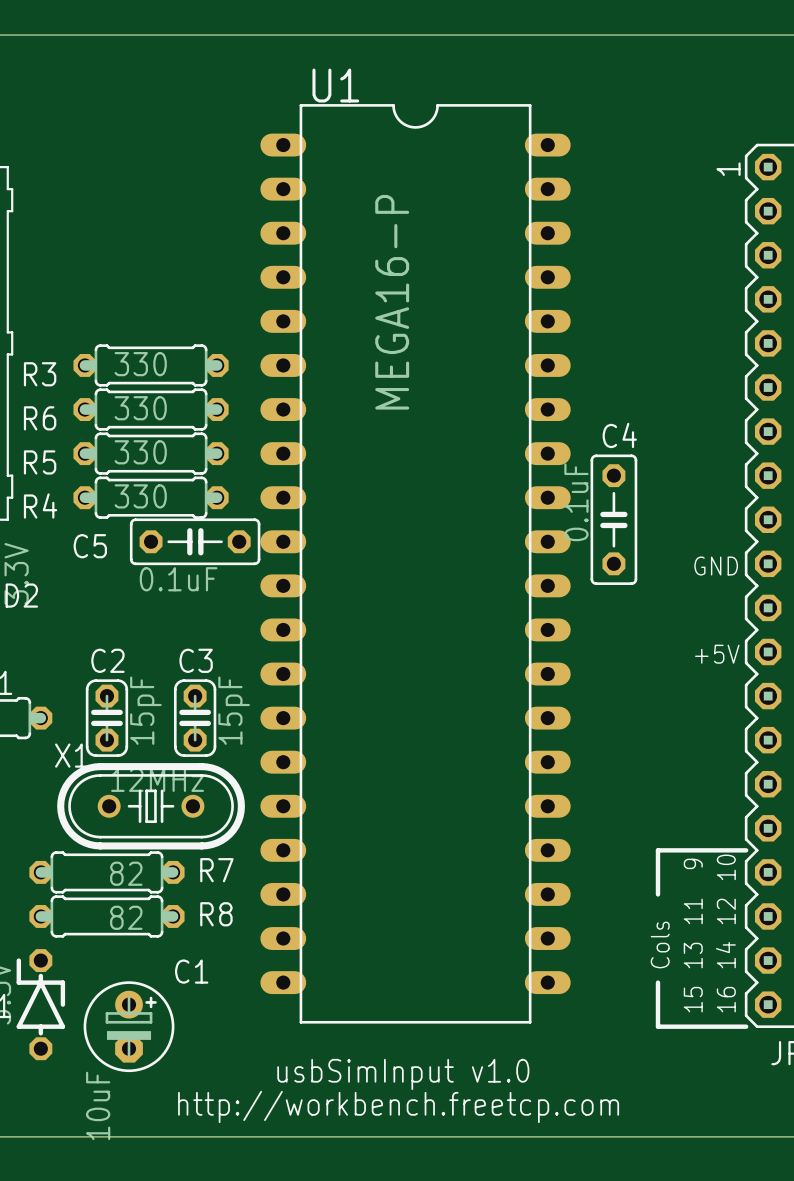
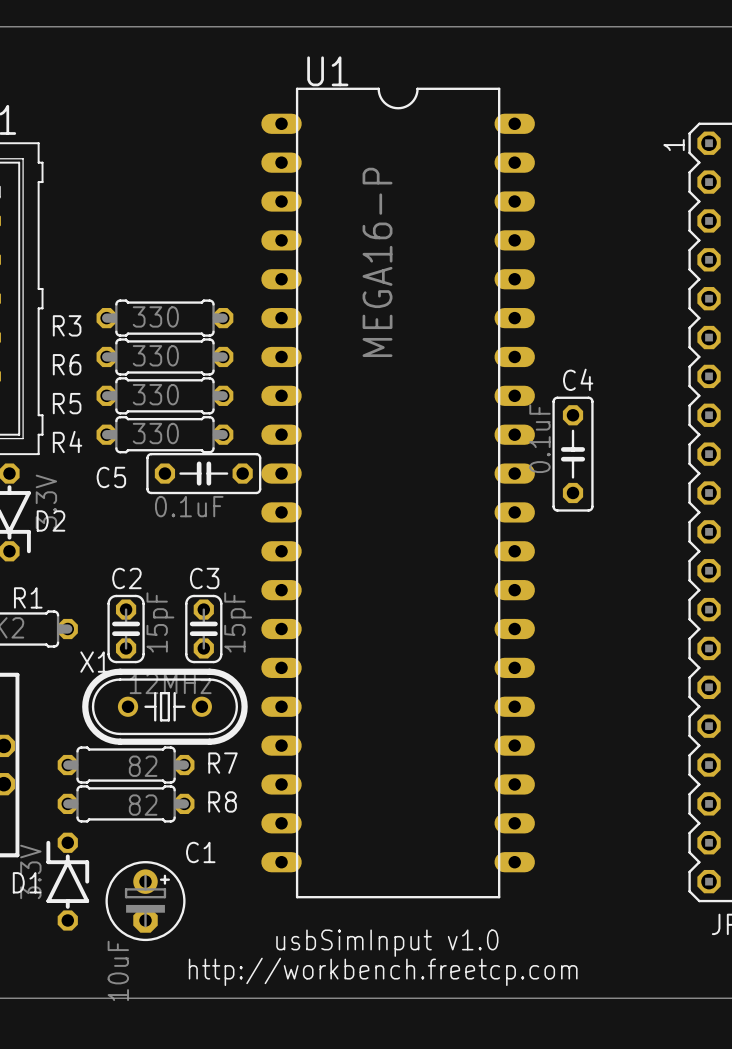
text: GND (716, 566) -> none
text: +5V (717, 654) -> none
line: (746, 850) (657, 850) (657, 894) -> none
text: 9 (693, 863) -> none
text: 10 (726, 867) -> none
text: 11 (693, 911) -> none
text: 12 (726, 911) -> none
text: Cols (660, 944) -> none
text: 13 (693, 955) -> none
text: 14 (725, 955) -> none
line: (657, 982) (657, 1026) (746, 1026) -> none
text: 15 (693, 999) -> none
text: 16 (726, 999) -> none

